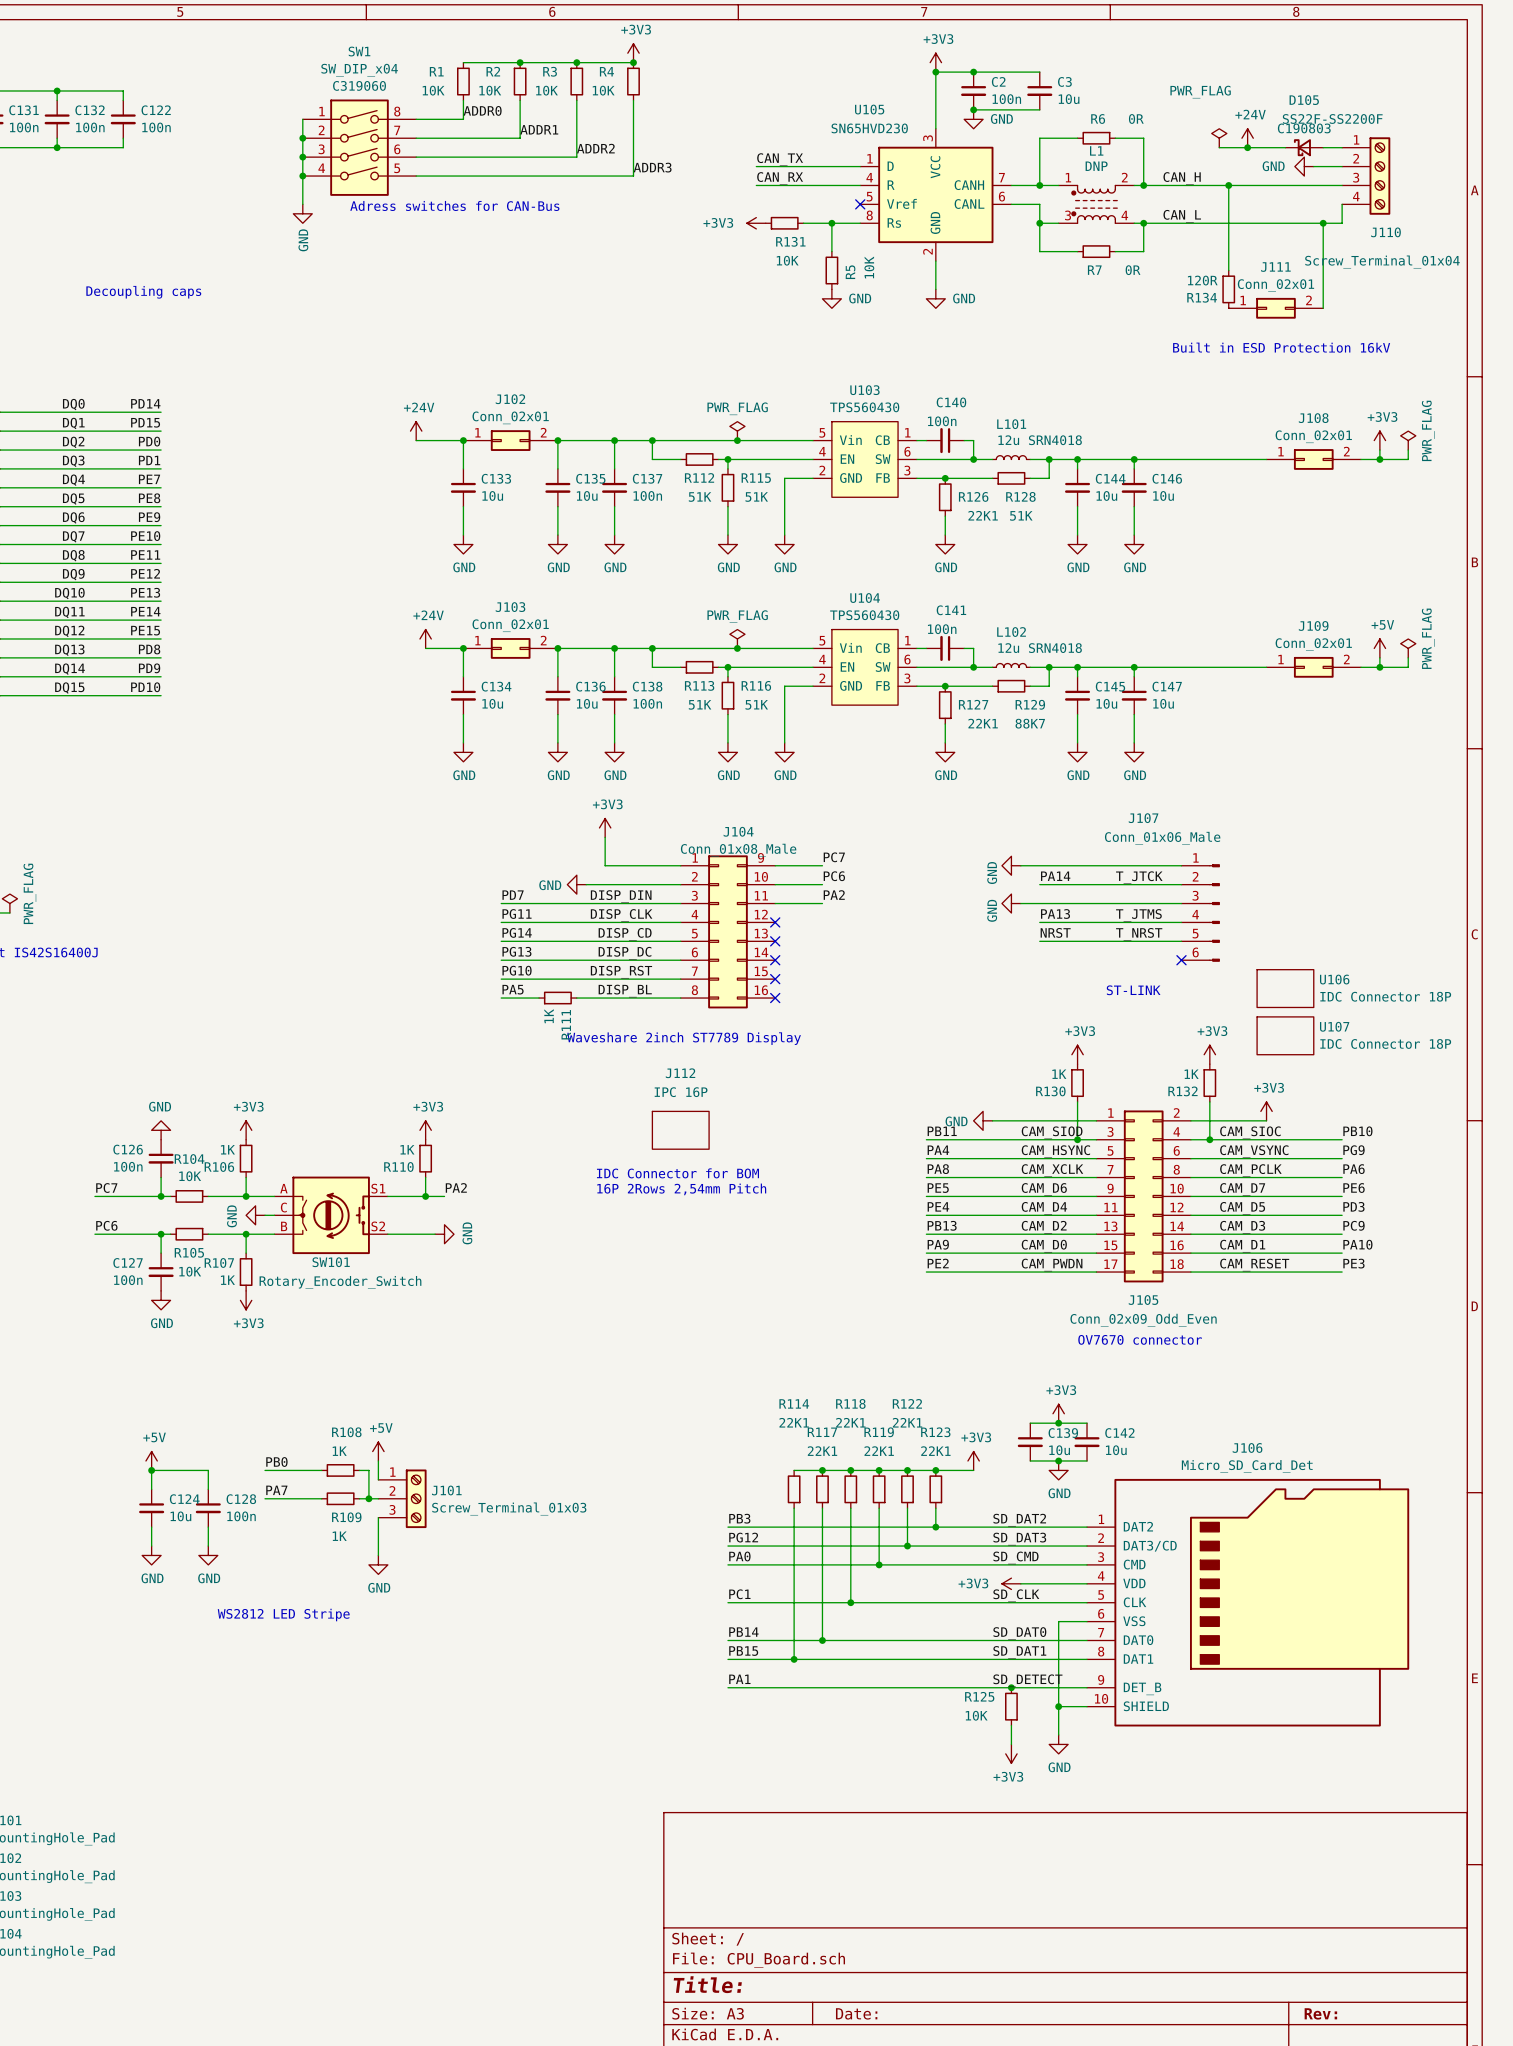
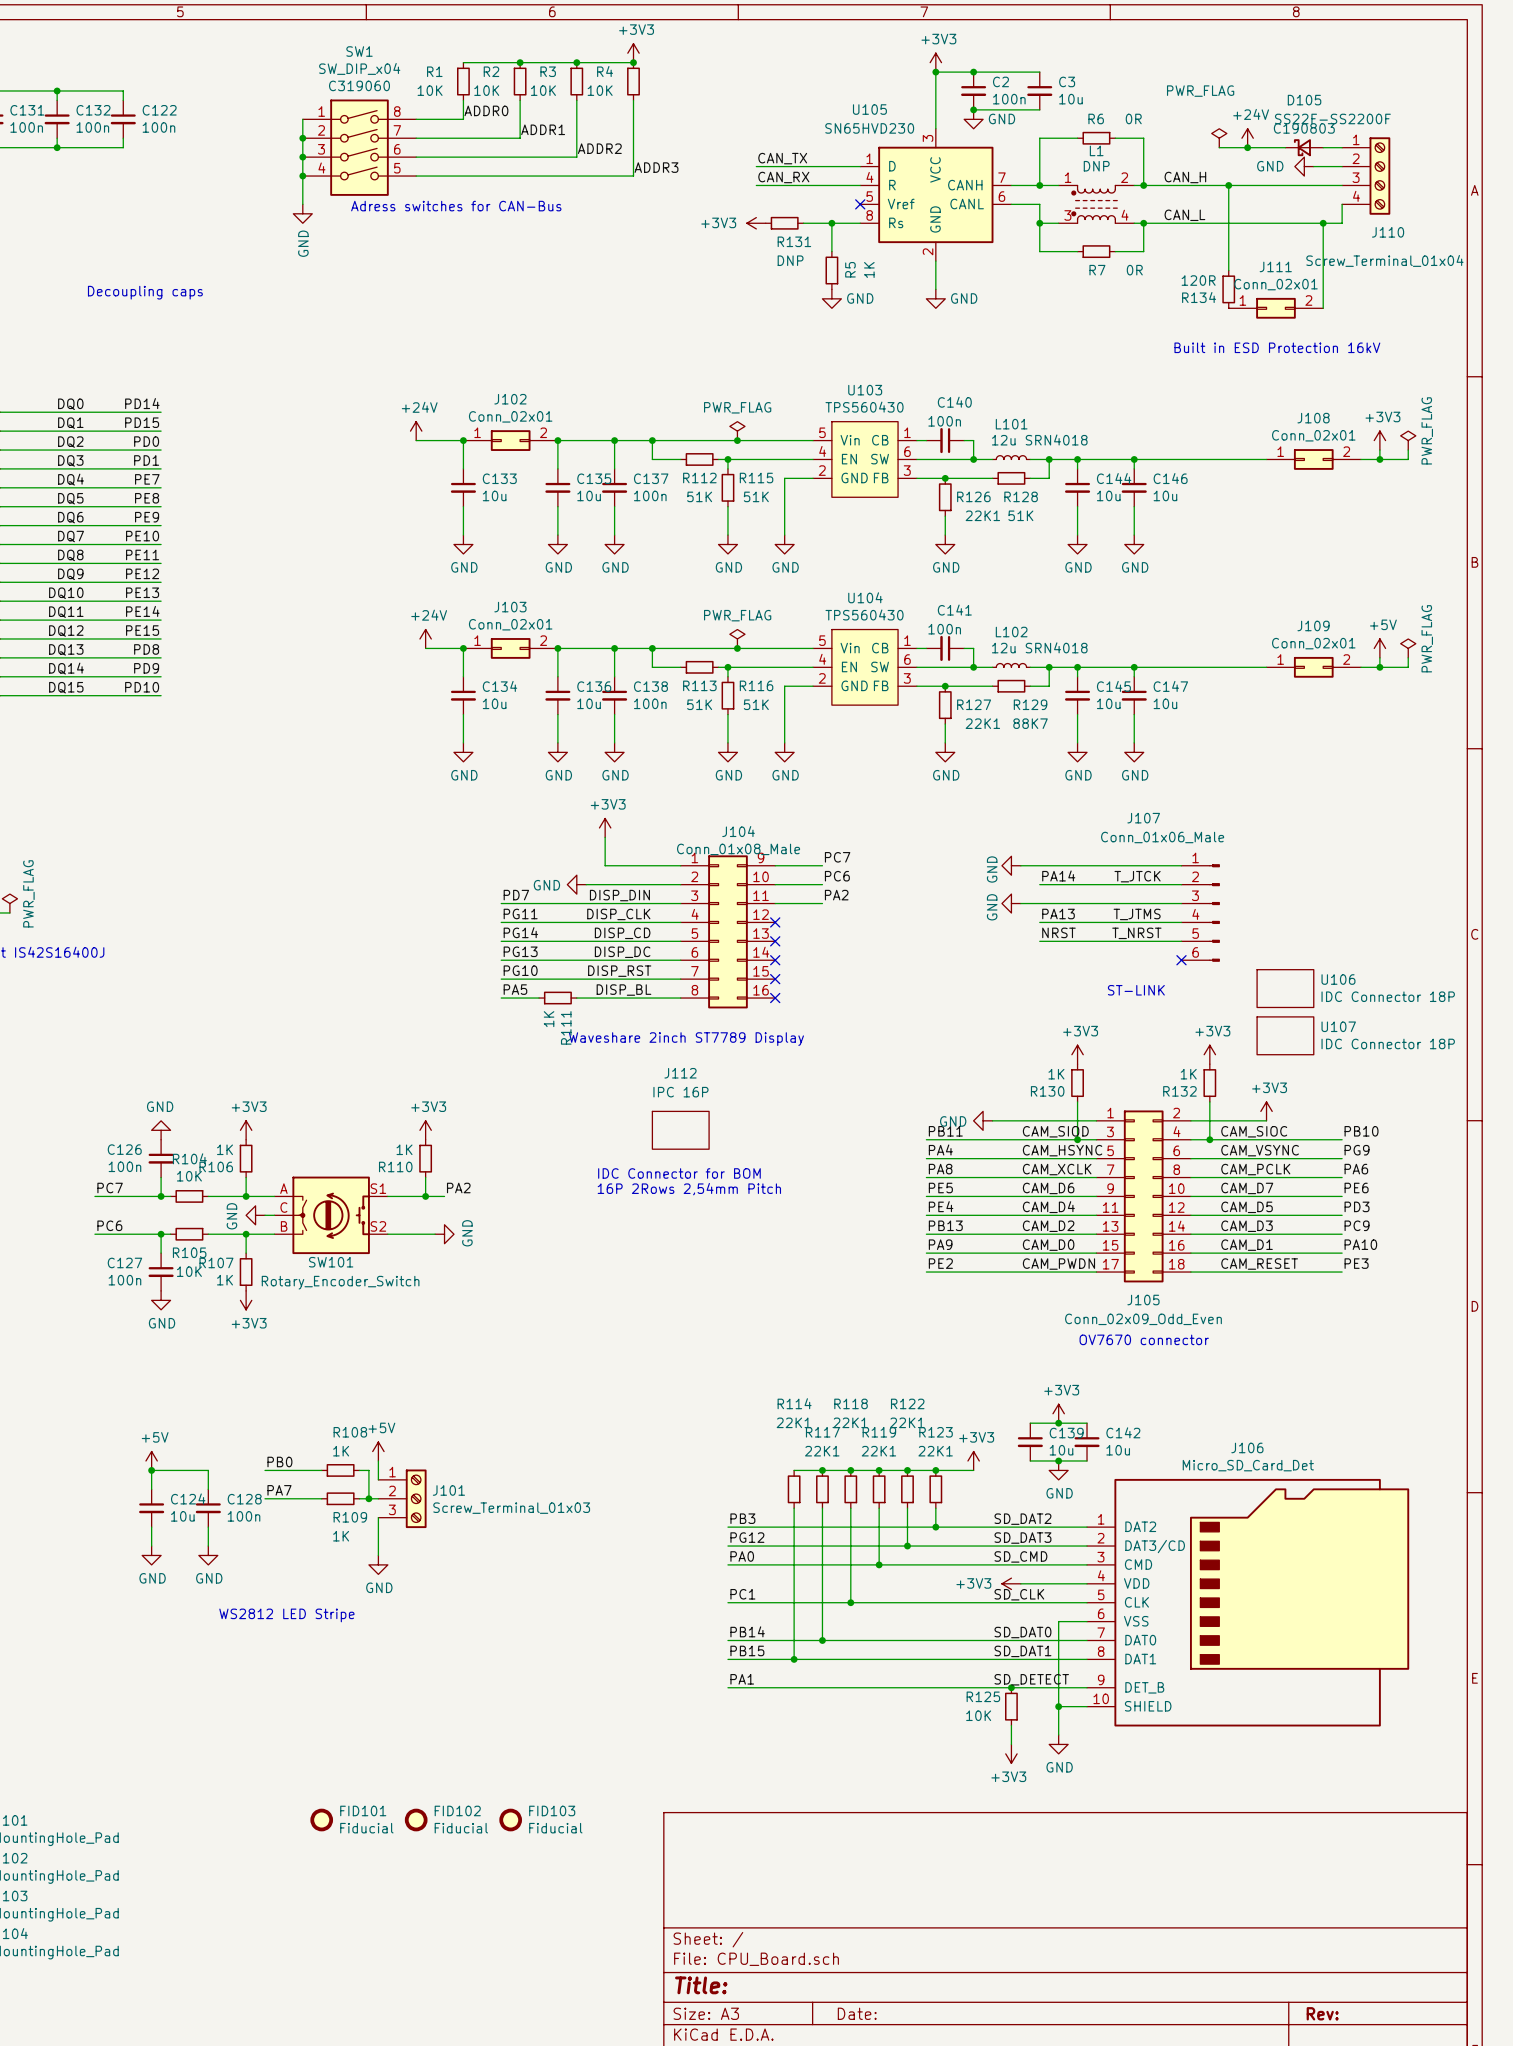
R131 value: 10K (787, 260) -> DNP (790, 260)
R5 value: 10K (869, 267) -> 1K (869, 269)
FID101: none -> Fiducial (321, 1820)
FID102: none -> Fiducial (416, 1820)
FID103: none -> Fiducial (510, 1820)

